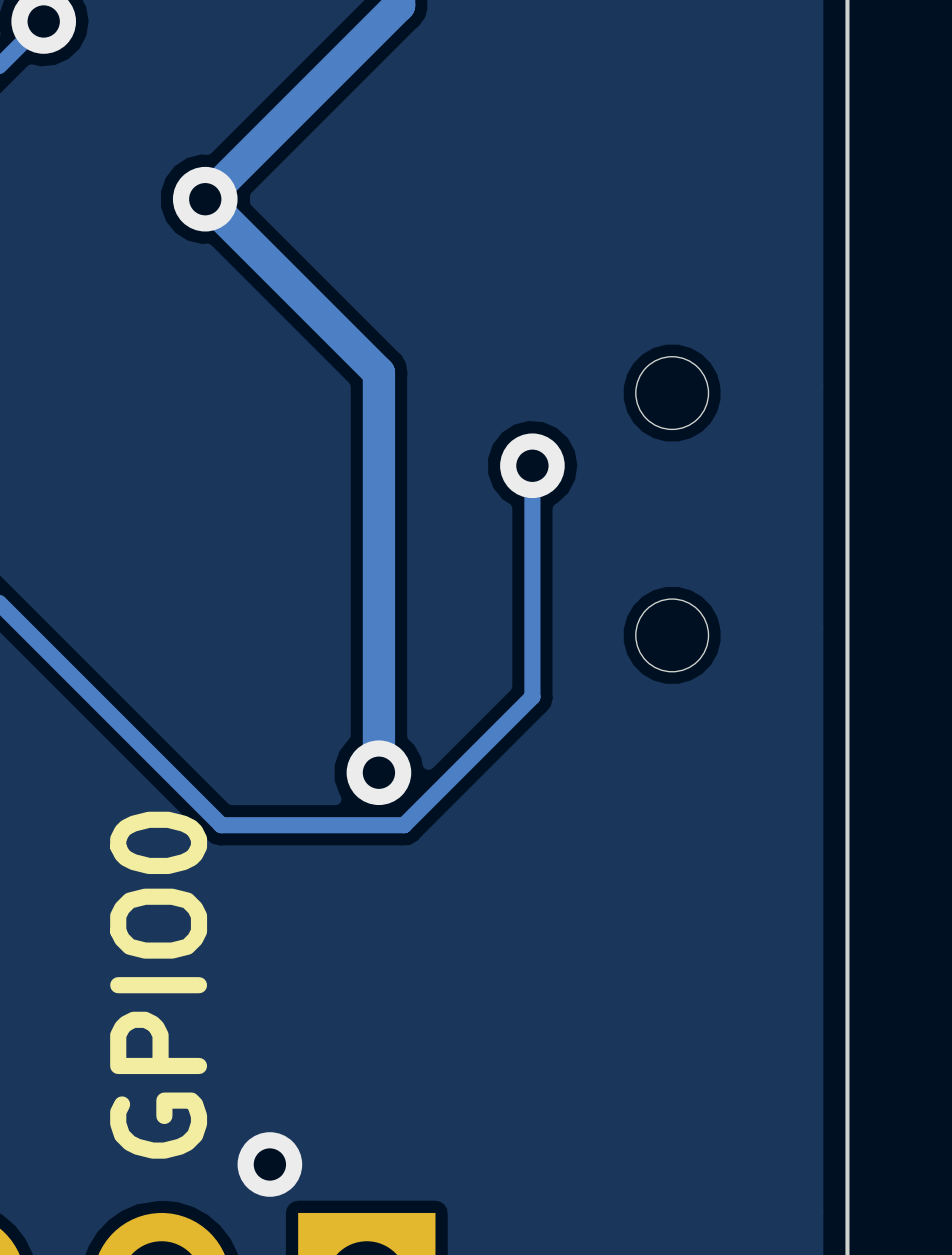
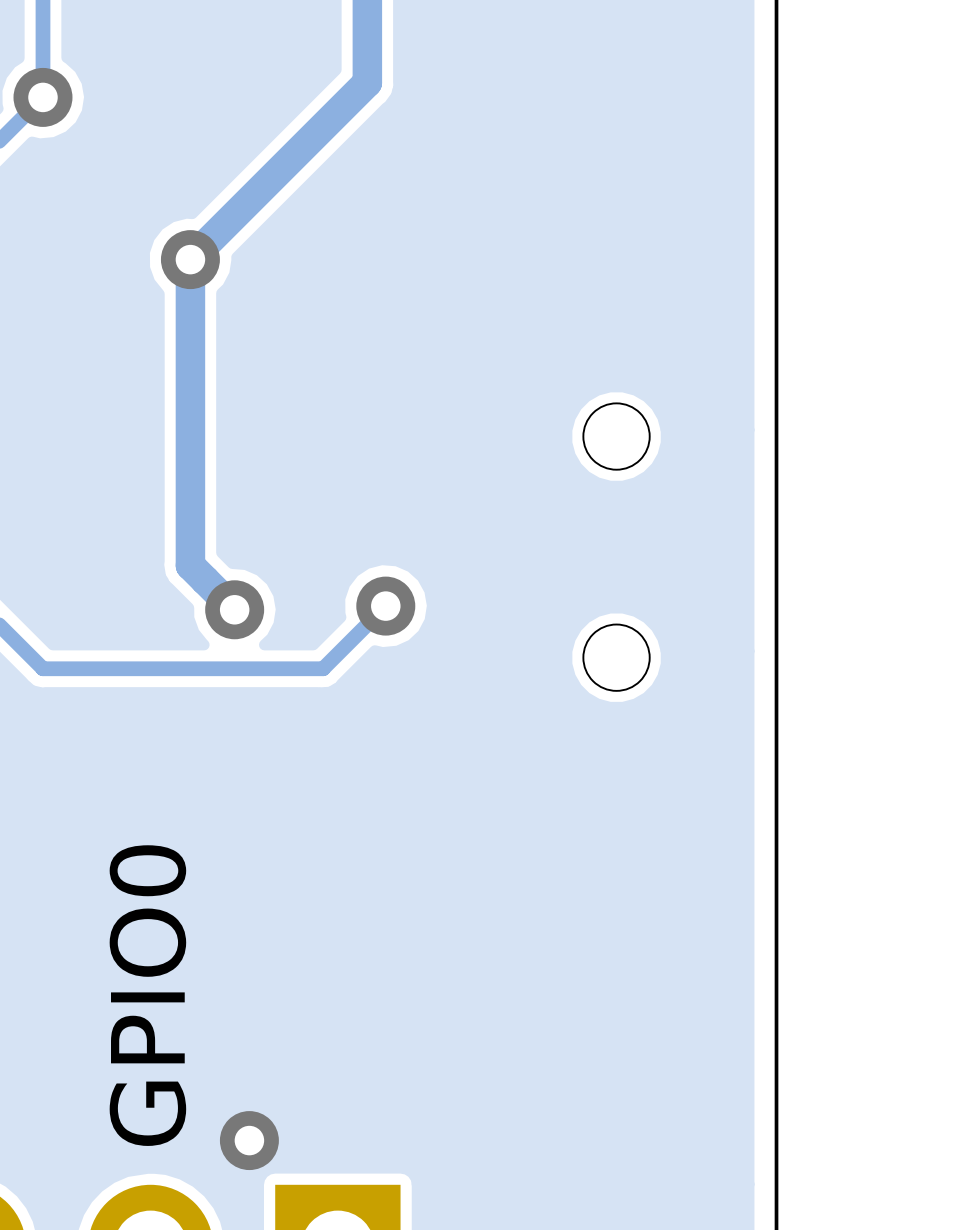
track: (205, 199) (378, 372) (378, 772) -> (190, 259) (190, 565) (234, 609)
track: (532, 465) (532, 696) (404, 825) (221, 825) (43, 647) -> (385, 606) (323, 668) (42, 668)
via: (532, 465) -> none
via: none -> (385, 606)
via: none -> (234, 609)
via: (378, 772) -> none

